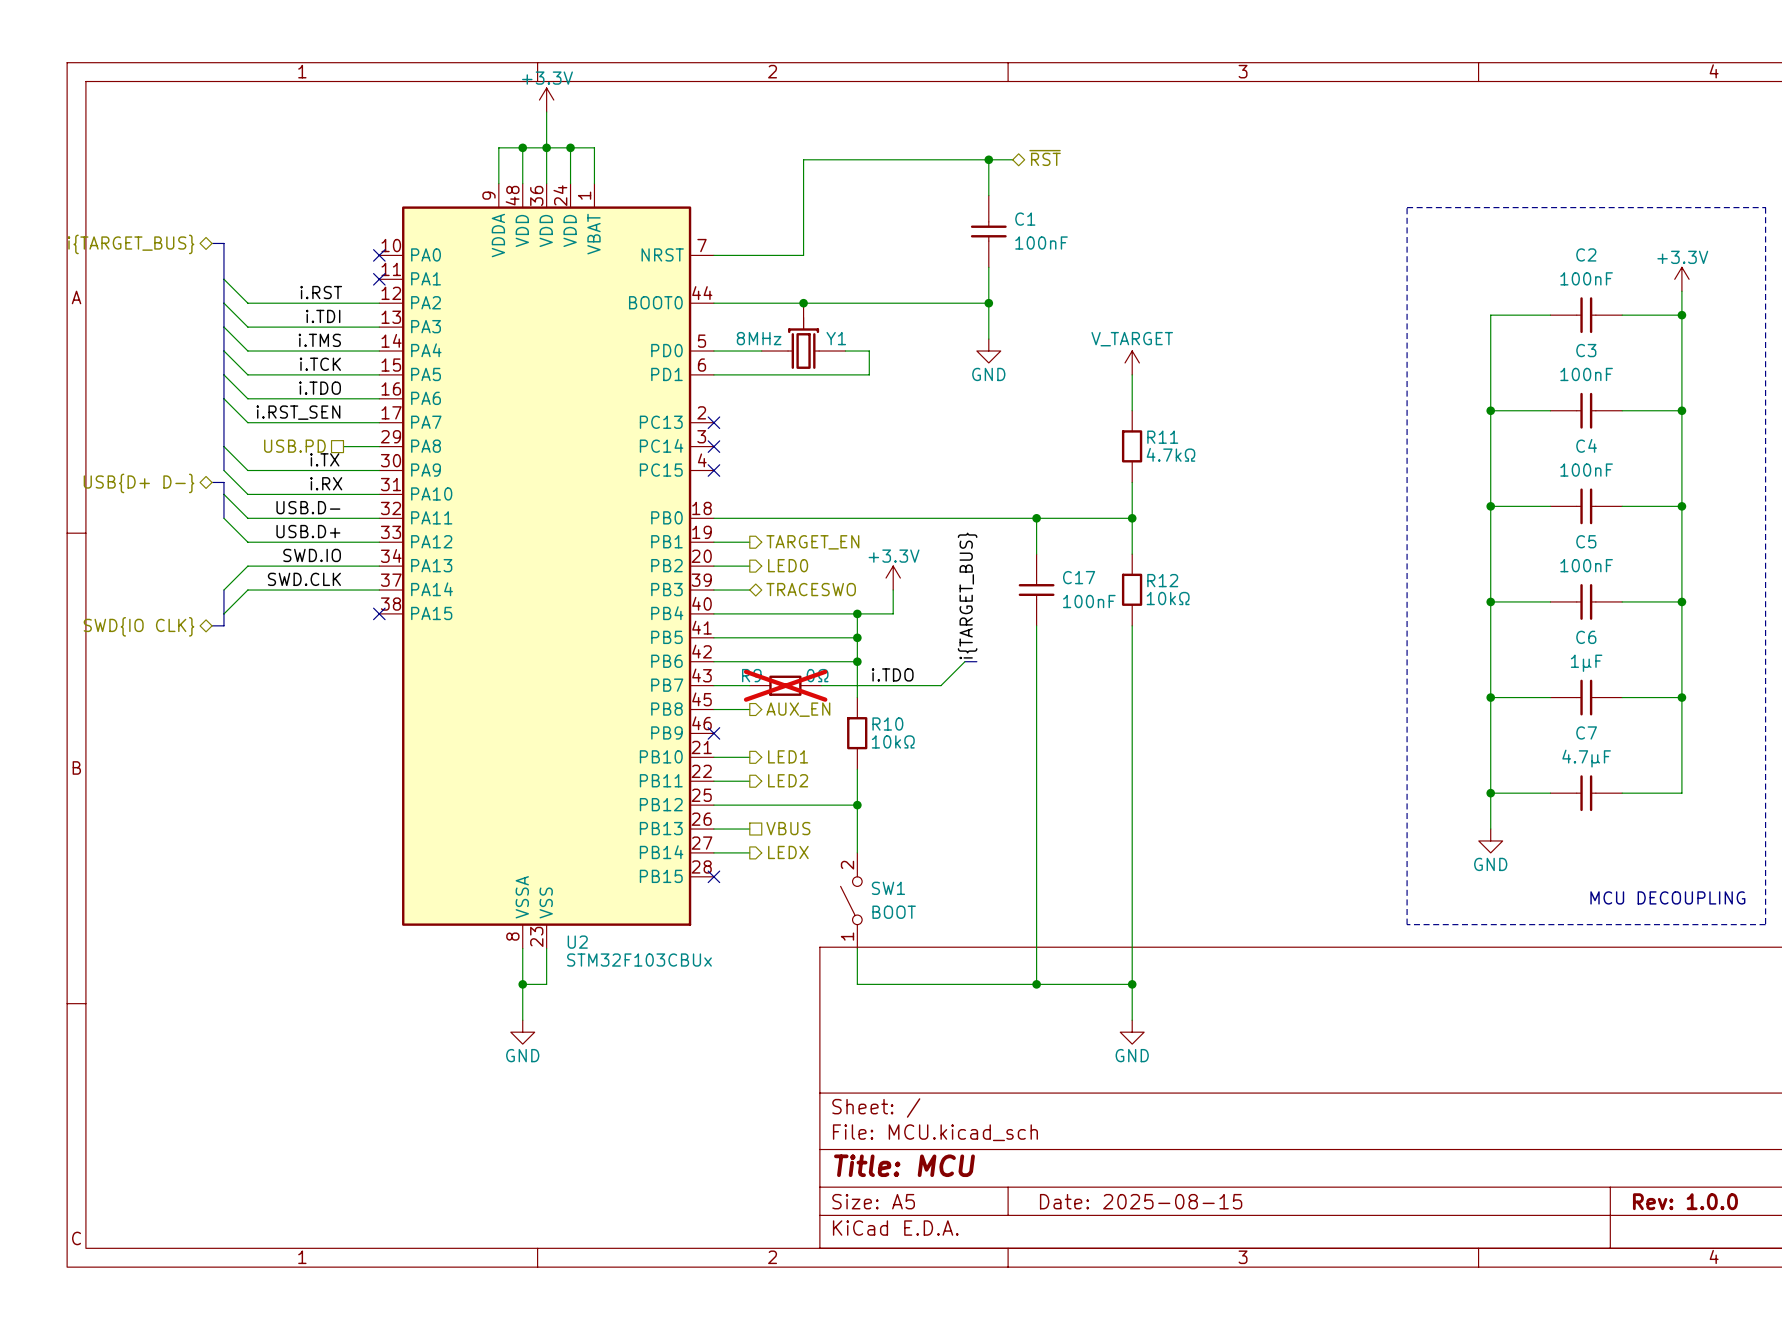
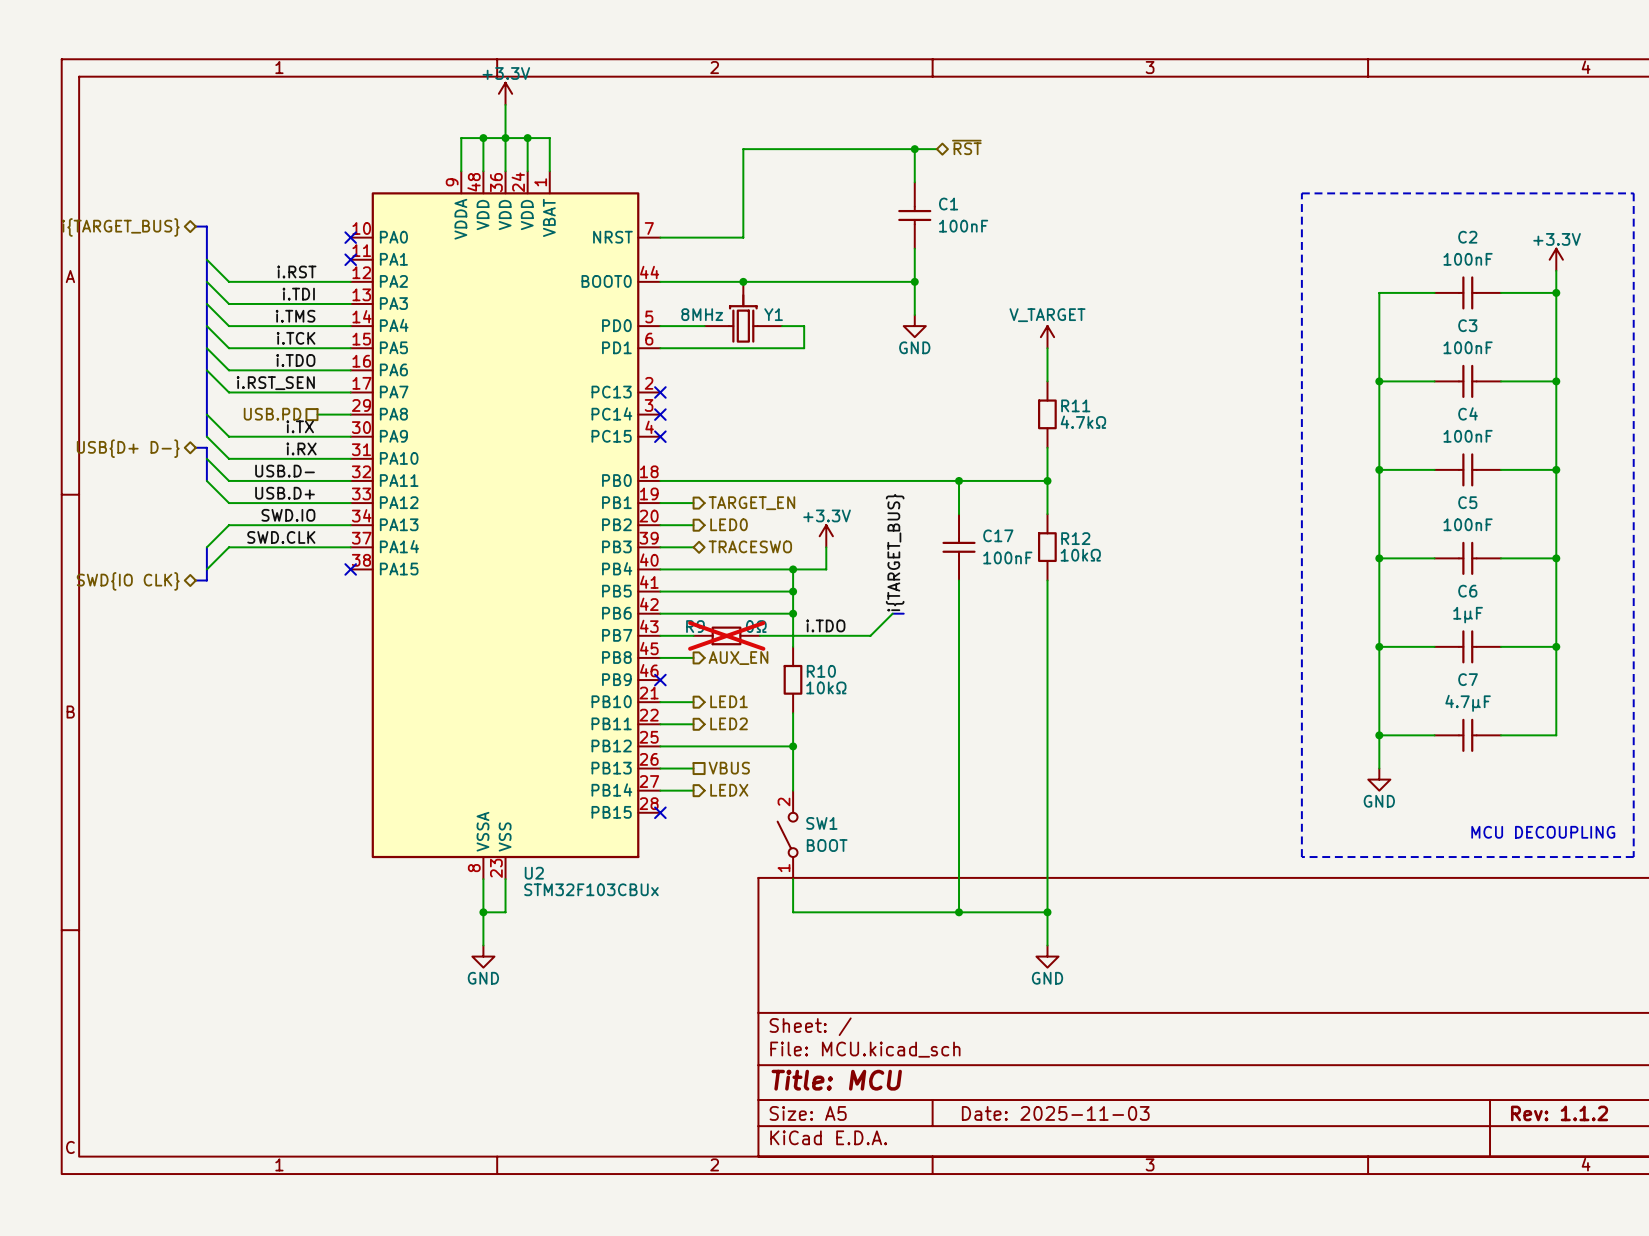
title block: Date: 2025-08-15 (1141, 1201) -> Date: 2025-11-03 (1055, 1113)
title block: Rev: 1.0.0 (1685, 1201) -> Rev: 1.1.2 (1559, 1113)

